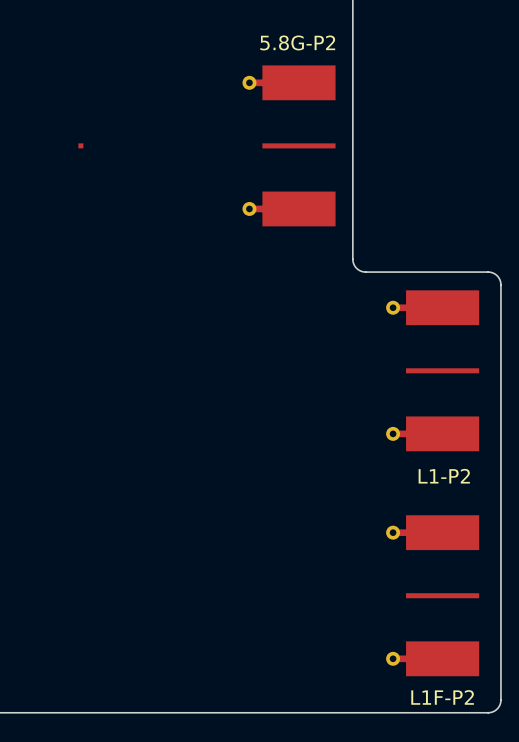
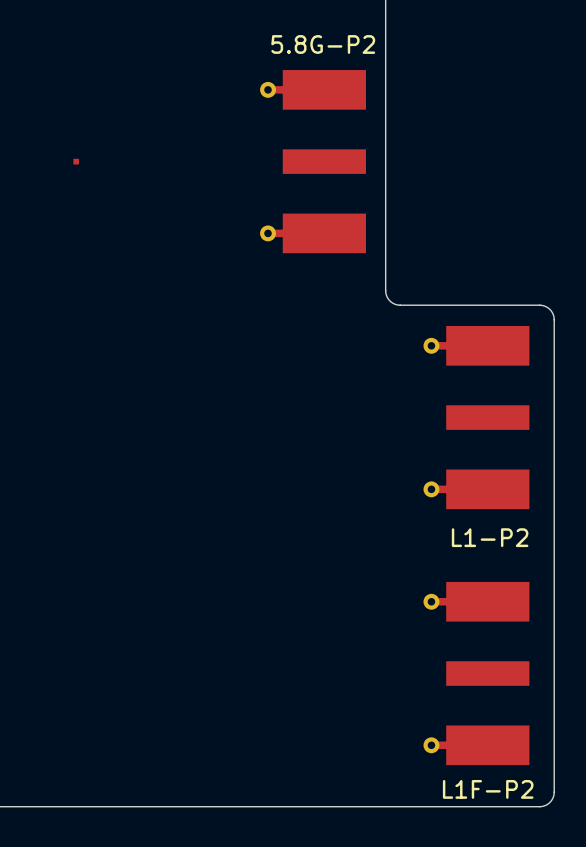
part footprint: [242, 65, 336, 227] -> [260, 70, 366, 254]
part footprint: [386, 290, 480, 452] -> [423, 325, 530, 510]
part footprint: [386, 515, 480, 677] -> [423, 581, 530, 766]

